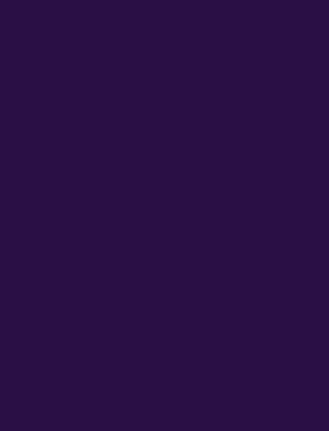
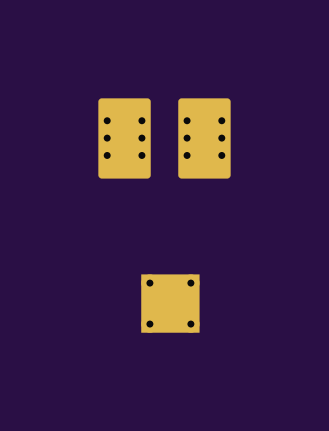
part: none -> (164, 138)
part: none -> (170, 303)

